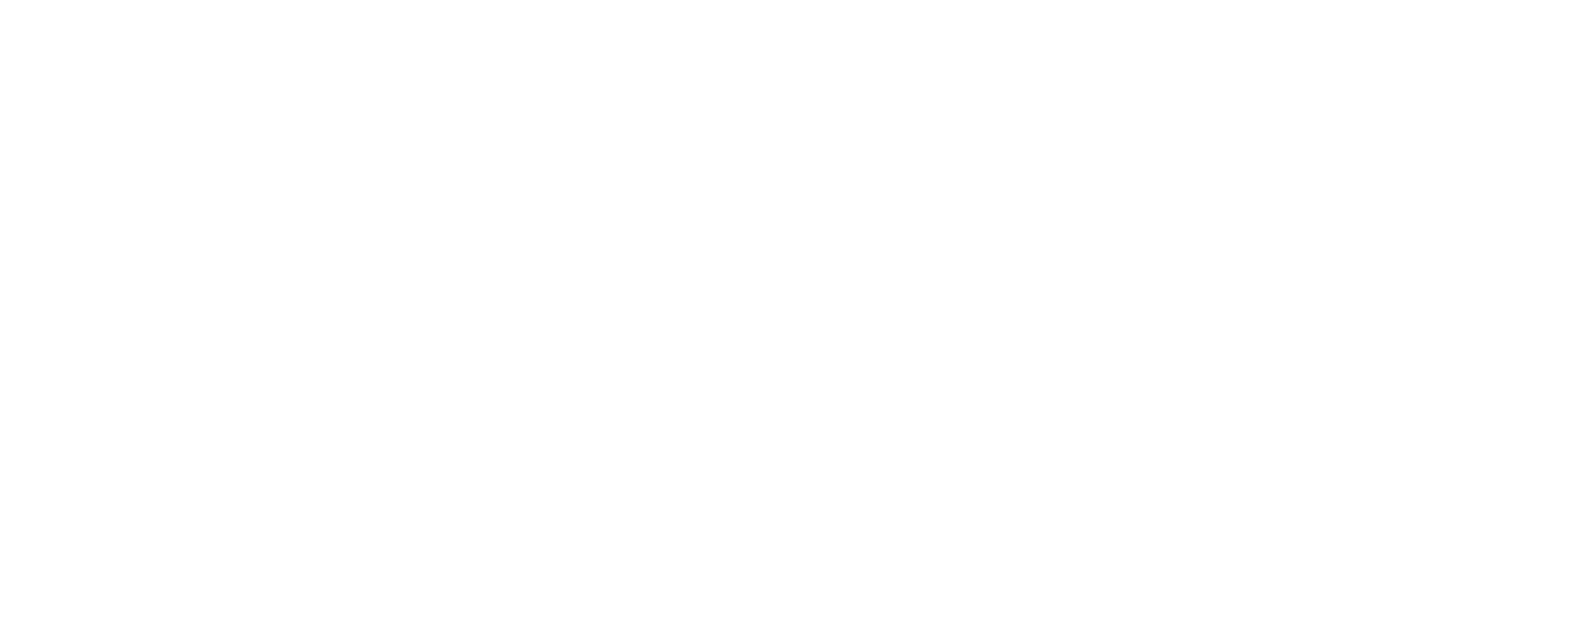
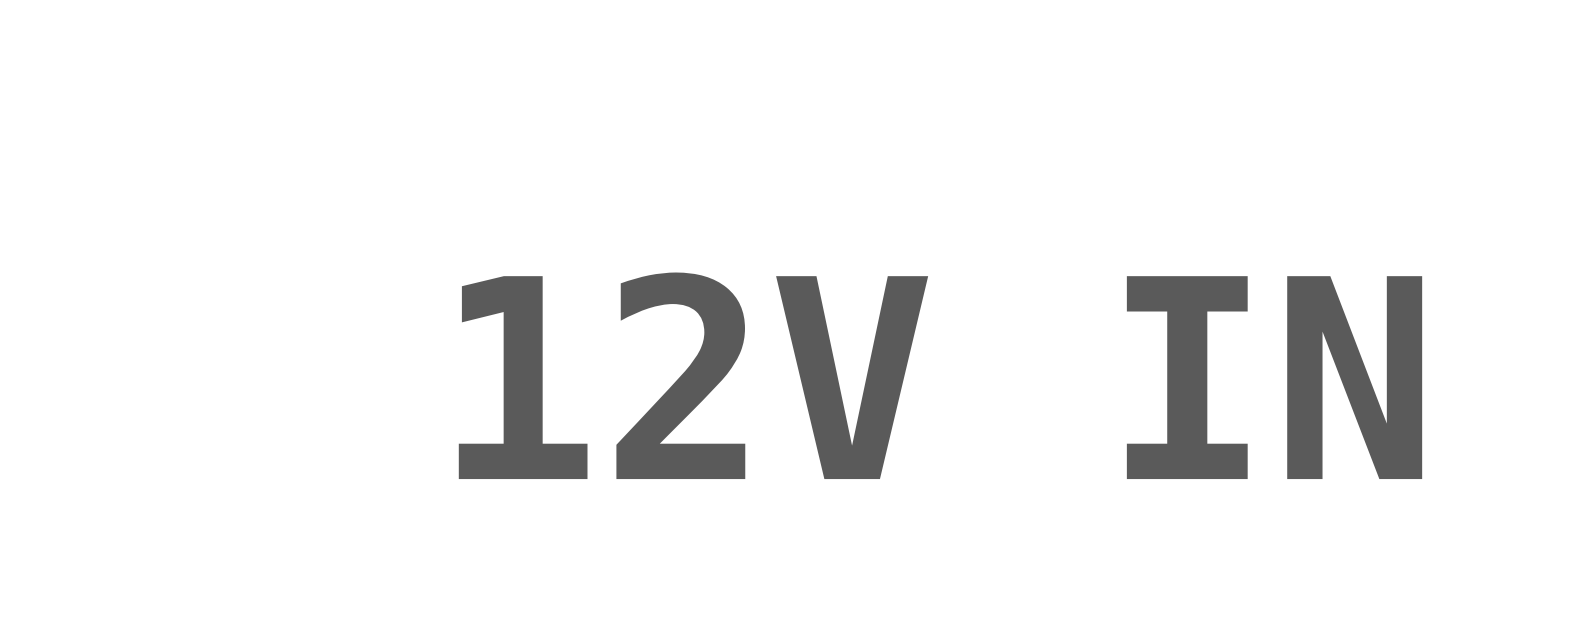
text: none -> 12V IN (940, 375)

